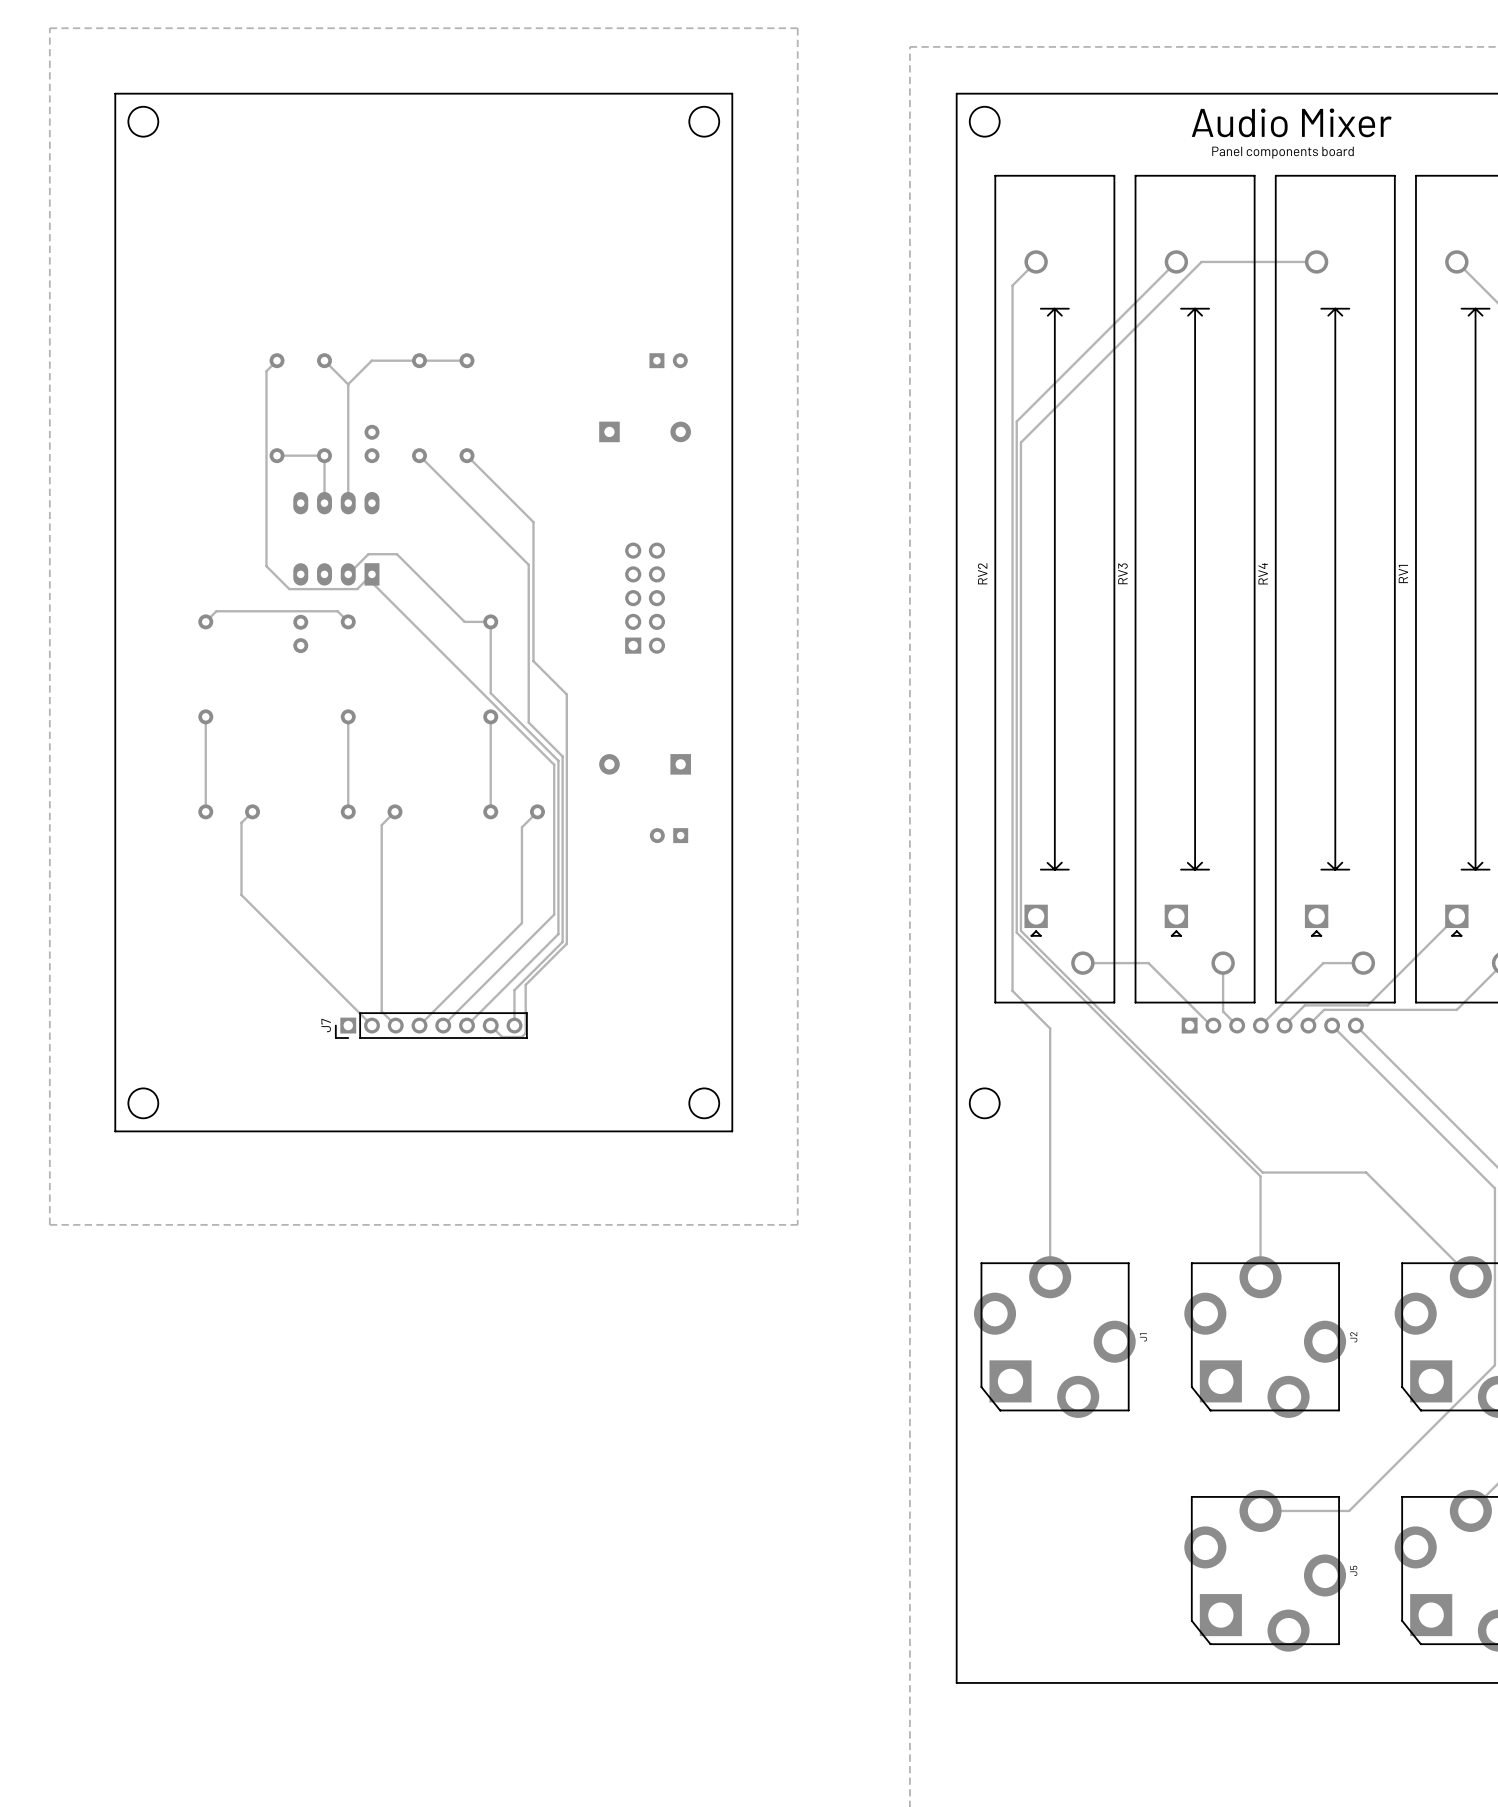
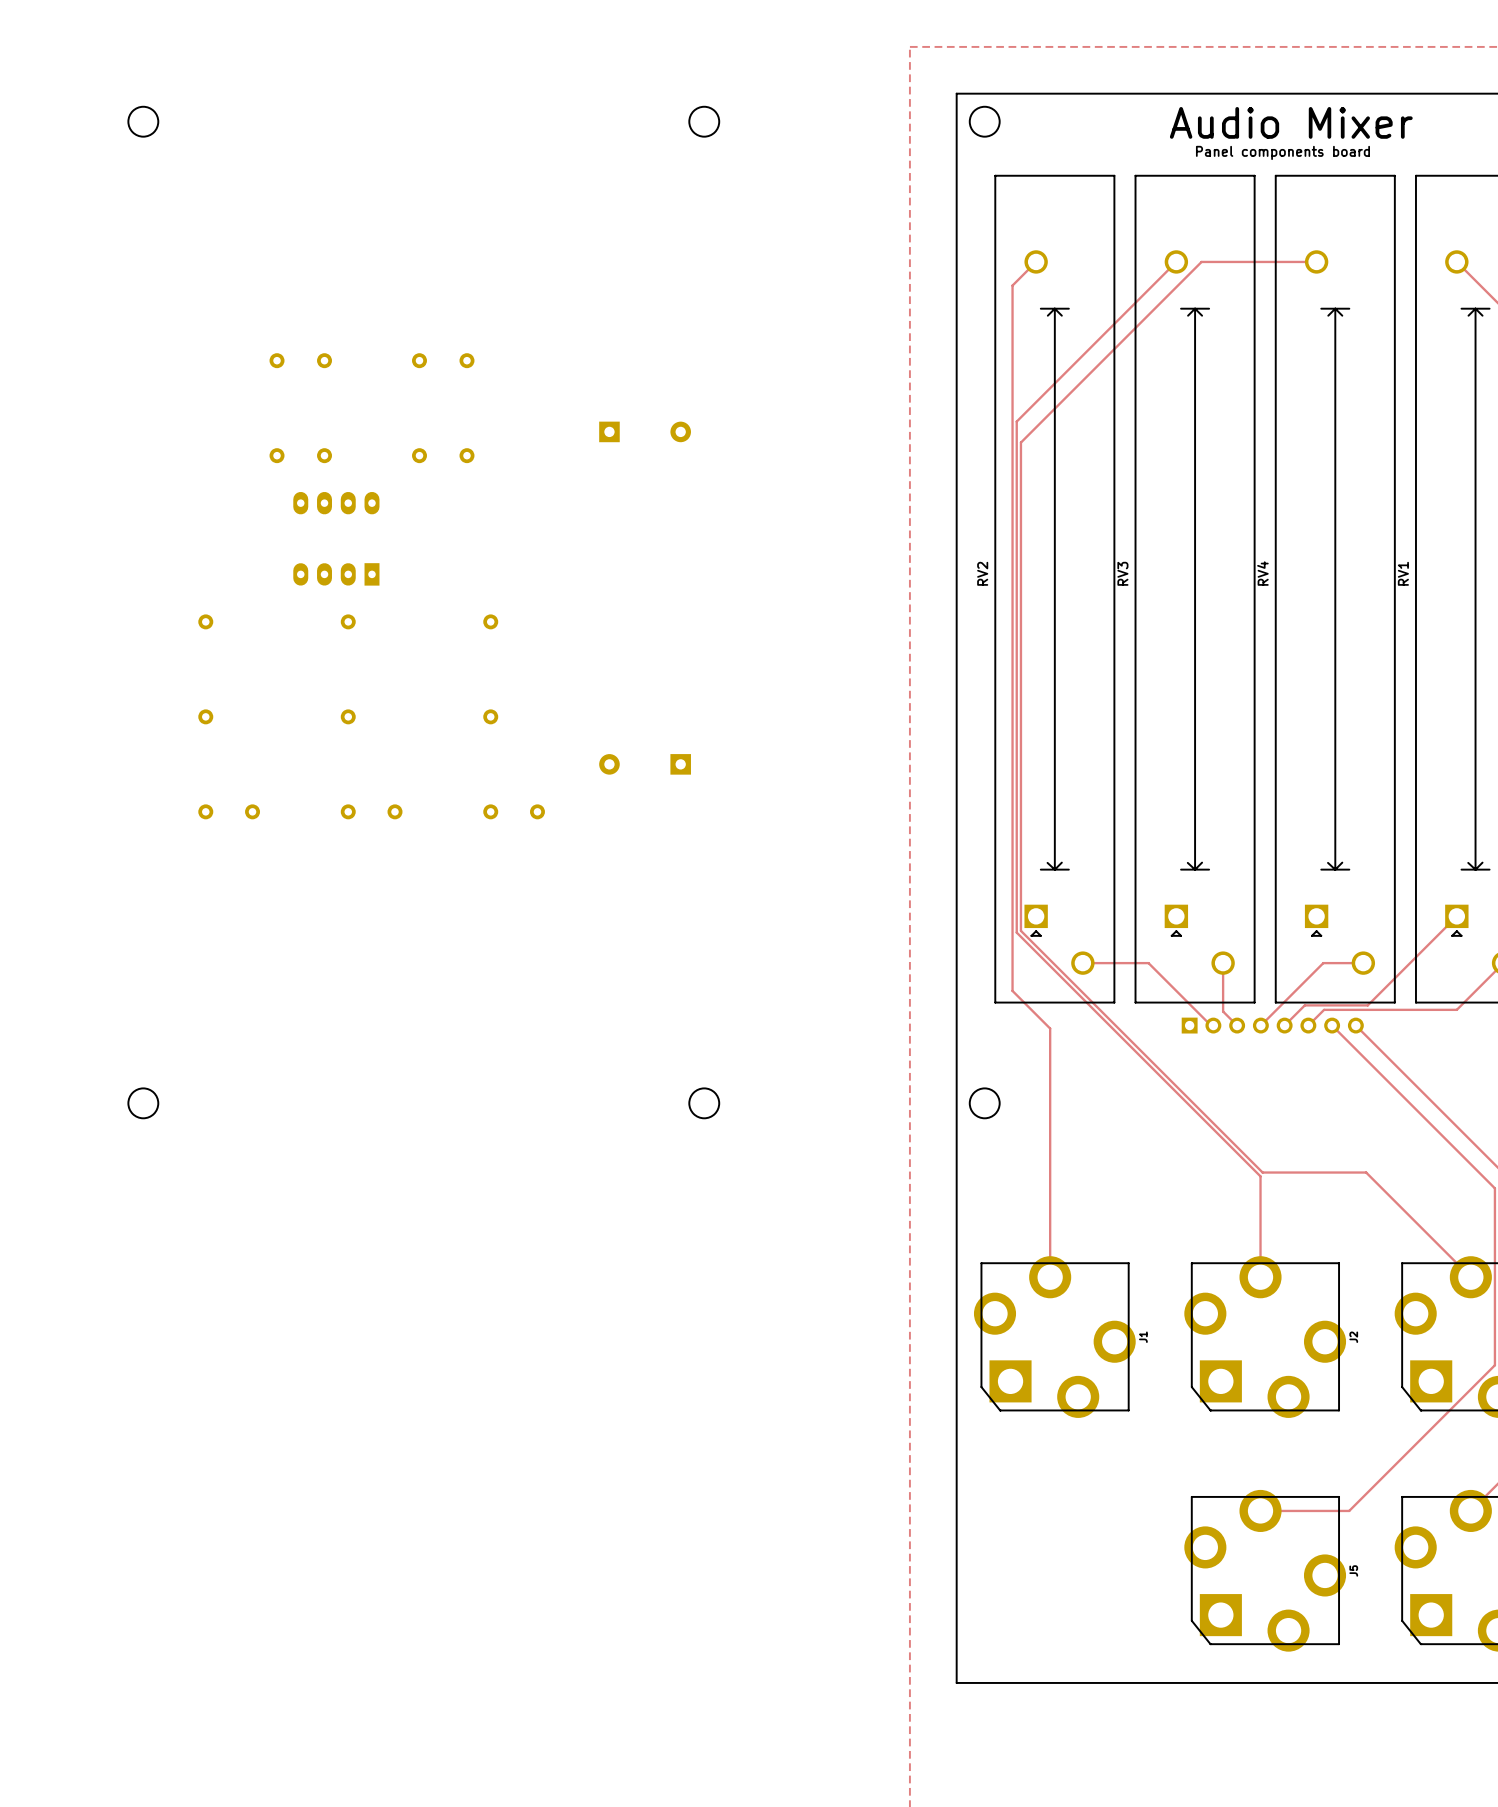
zone outline: (49, 28) (49, 1224) (797, 1224) (797, 28) (49, 28) -> none
board edge: (115, 93) (732, 93) (732, 1131) (115, 1131) (115, 93) -> none
track: (277, 360) (266, 371) (266, 566) (289, 589) (357, 589) (372, 574) (372, 582) (554, 764) (554, 914) (443, 1025) -> none
track: (324, 360) (348, 384) -> none
track: (466, 360) (371, 360) (348, 384) (348, 503) -> none
part: (668, 360) -> none
part: (372, 443) -> none
track: (277, 455) (324, 455) (324, 503) -> none
track: (419, 455) (528, 564) (528, 722) (562, 756) (562, 942) (514, 990) (514, 1025) -> none
track: (466, 455) (533, 522) (533, 661) (566, 694) (566, 943) (525, 984) (525, 1033) (521, 1036) (502, 1036) (490, 1025) -> none
track: (348, 574) (368, 554) (396, 554) (464, 621) (490, 621) (490, 693) (558, 760) (558, 934) (466, 1025) -> none
part: (645, 598) -> none
track: (205, 621) (216, 611) (337, 611) (348, 621) -> none
part: (300, 633) -> none
track: (205, 716) (205, 811) -> none
track: (348, 716) (348, 811) -> none
track: (490, 716) (490, 811) -> none
track: (252, 811) (241, 822) (241, 895) (372, 1025) -> none
track: (395, 811) (381, 825) (381, 1011) (395, 1025) -> none
track: (537, 811) (521, 827) (521, 923) (419, 1025) -> none
part: (669, 835) -> none
J7: (431, 1025) -> none

